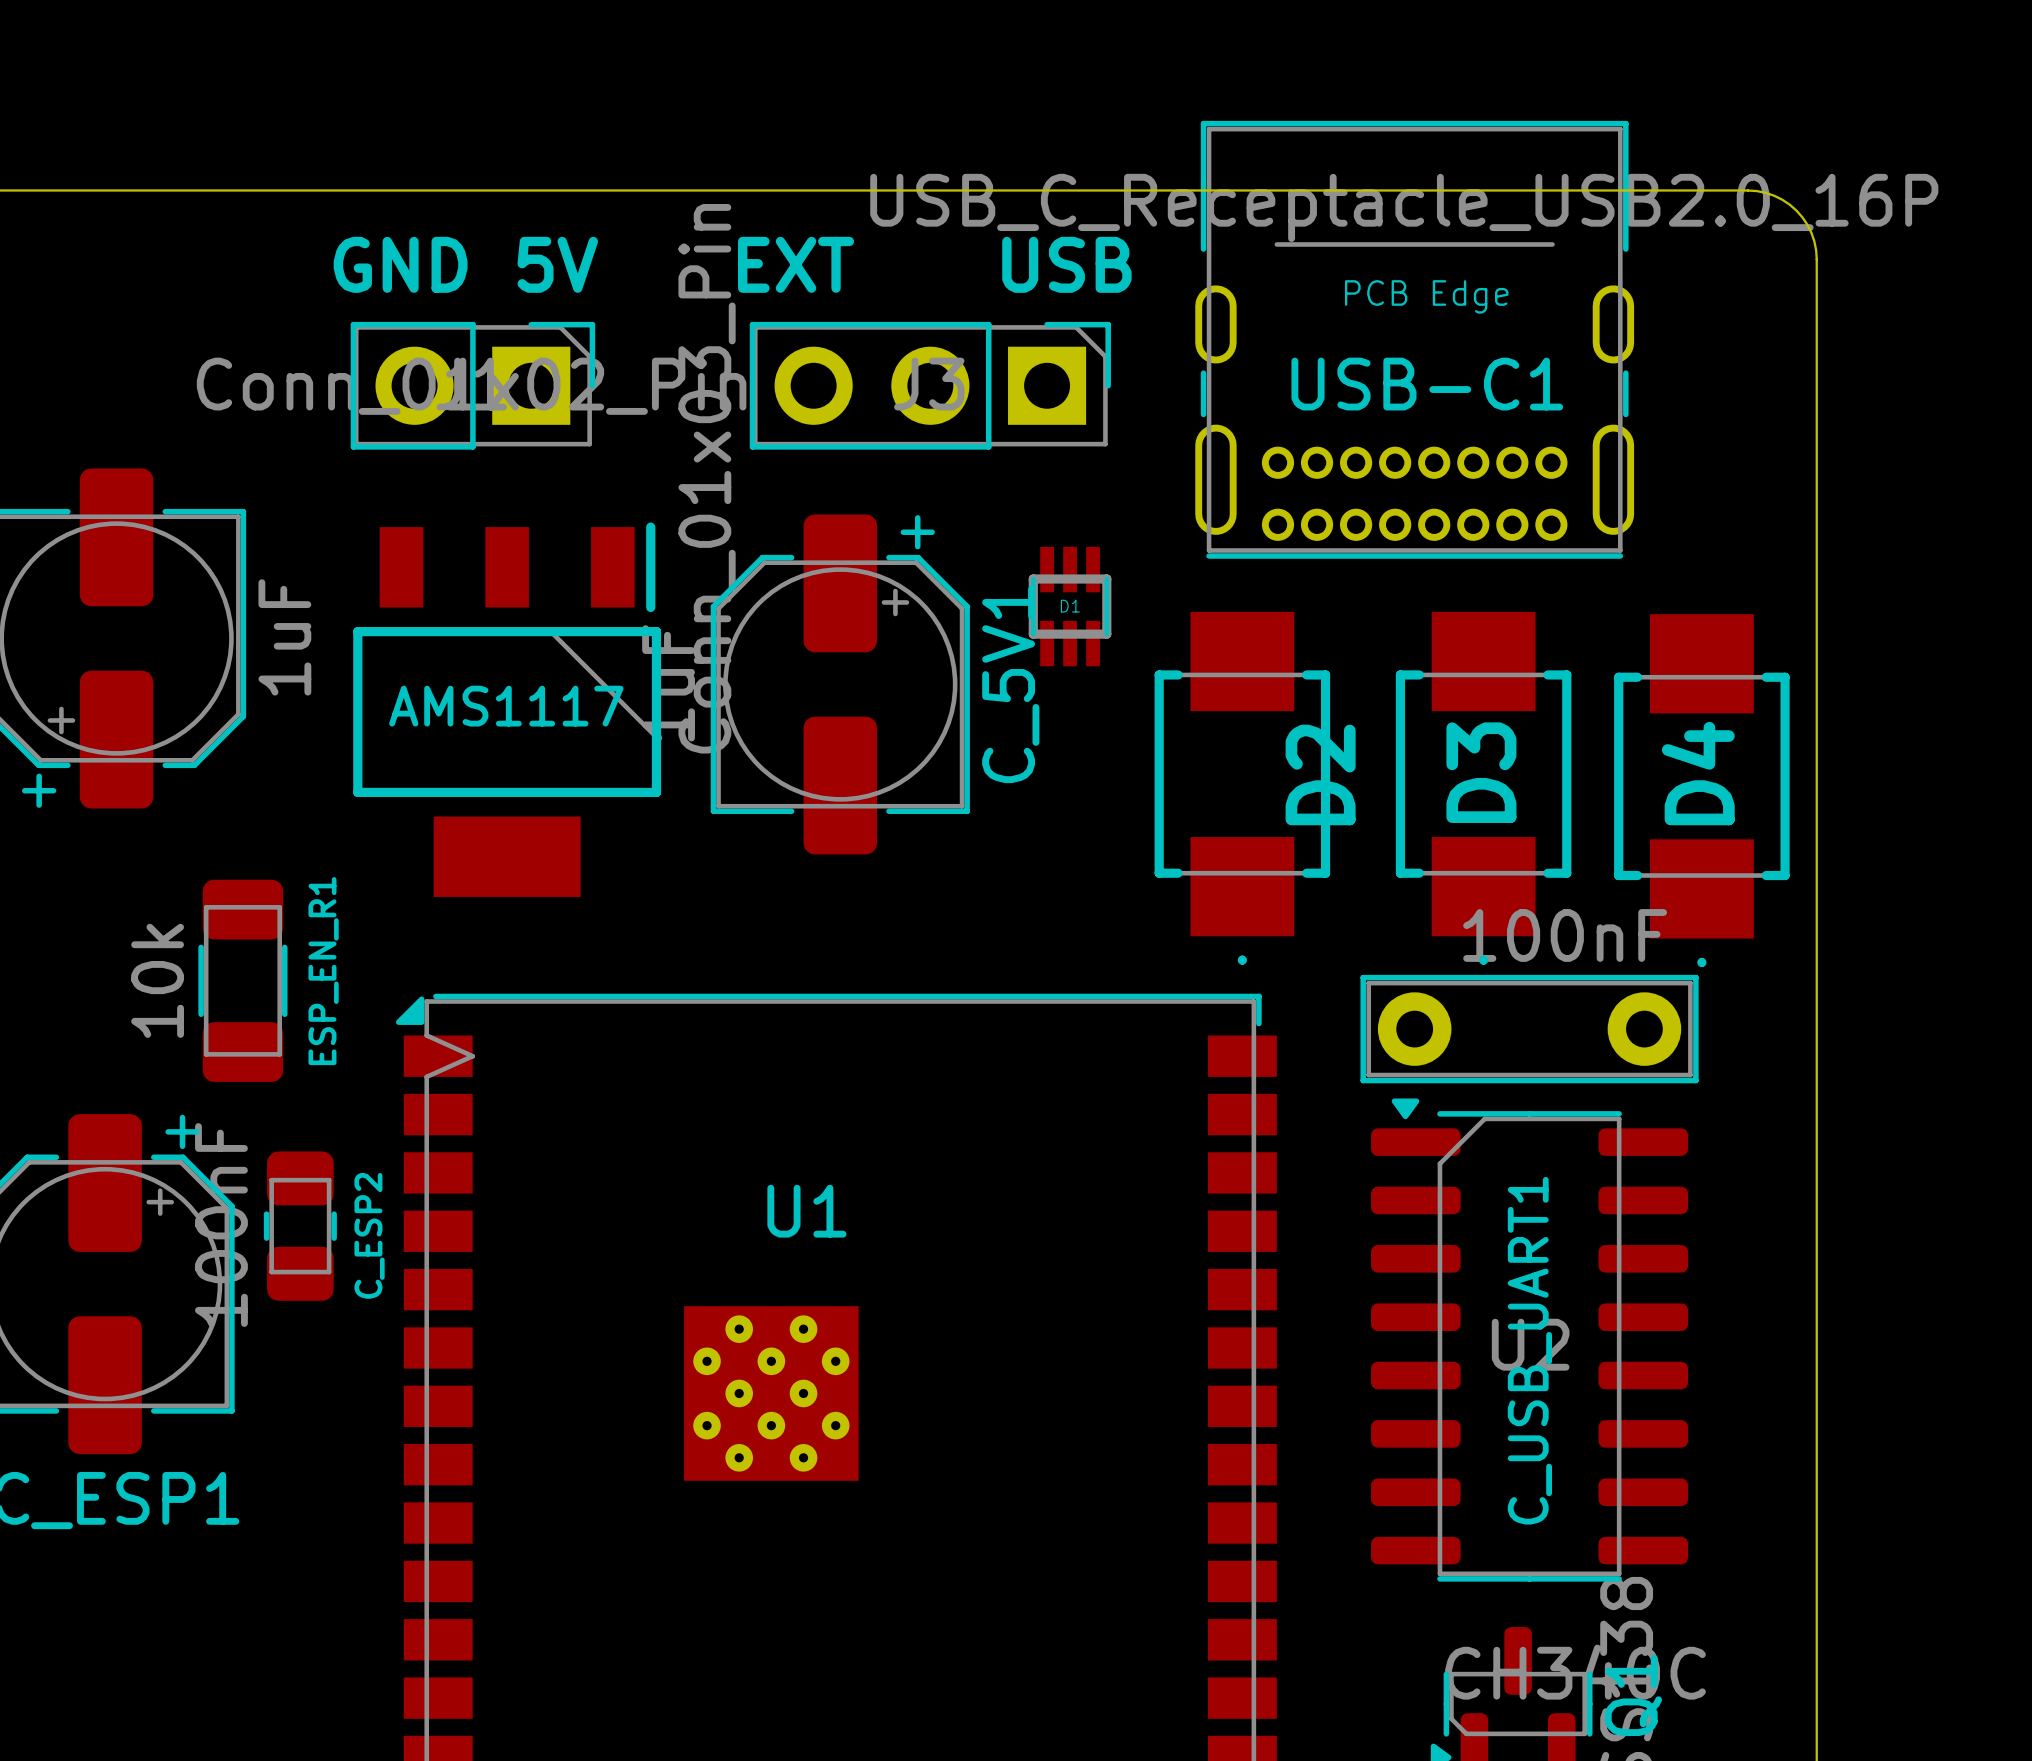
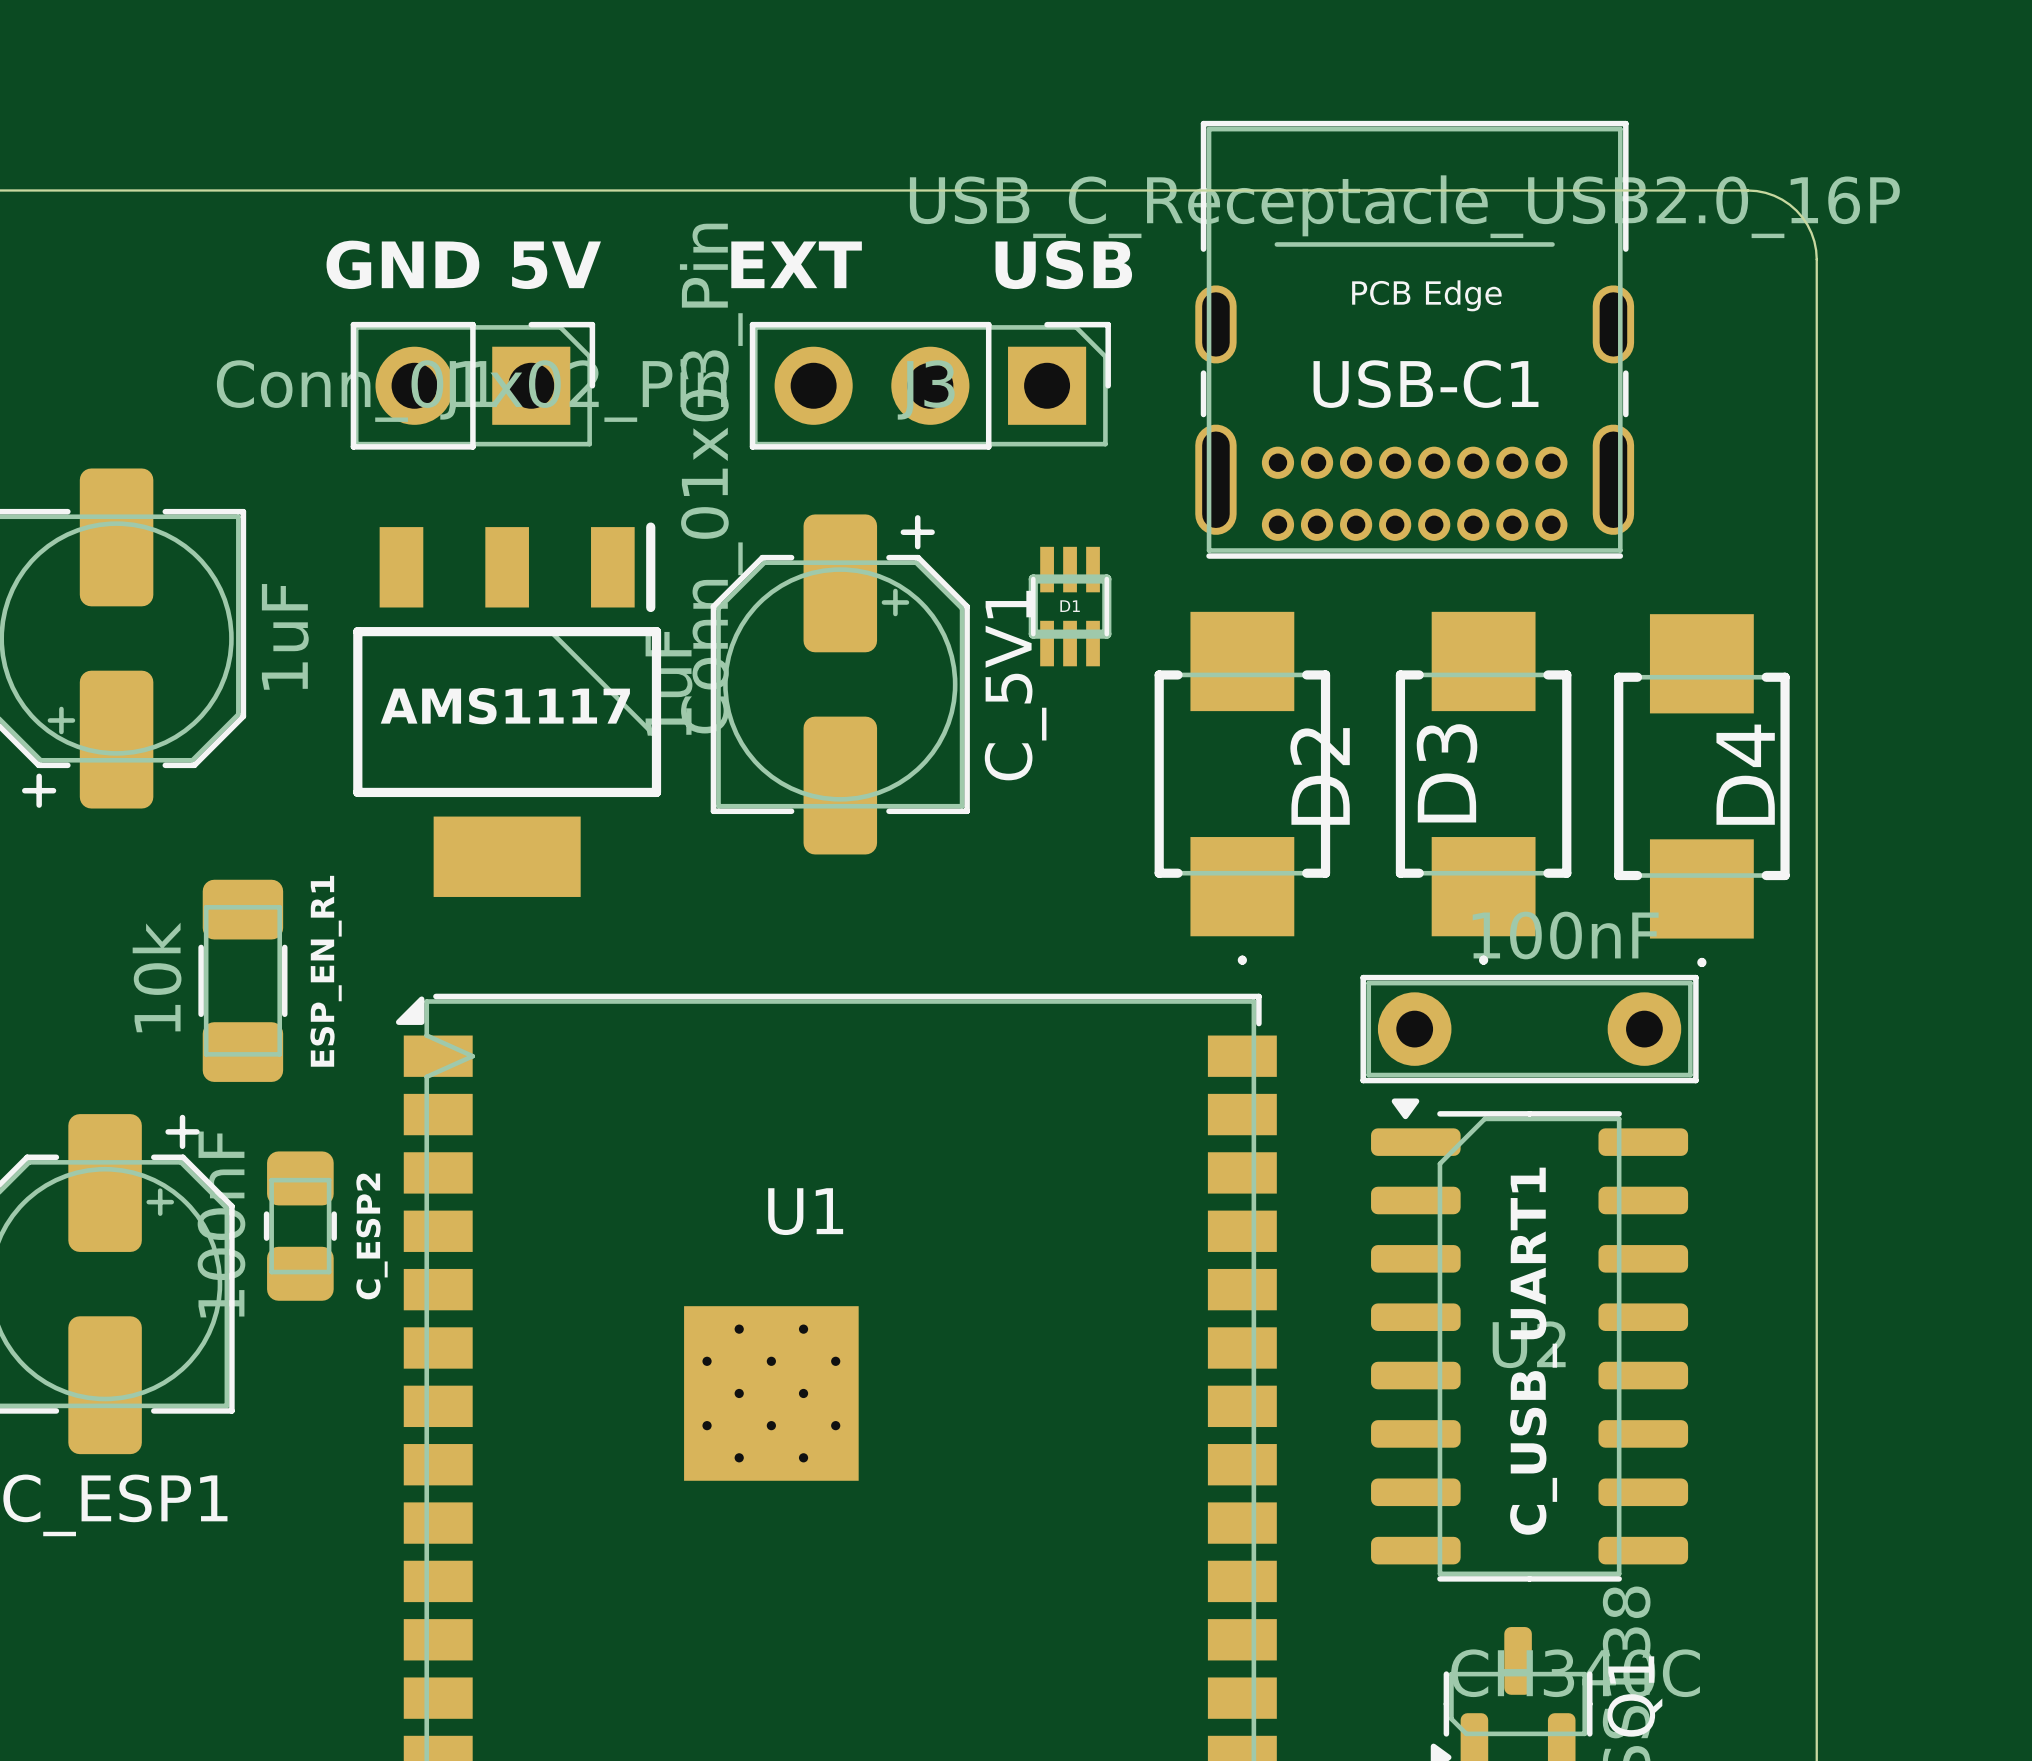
D3 name position: D3 (1481, 772) -> D3 (1447, 773)
D4 name position: D4 (1698, 773) -> D4 (1745, 774)

